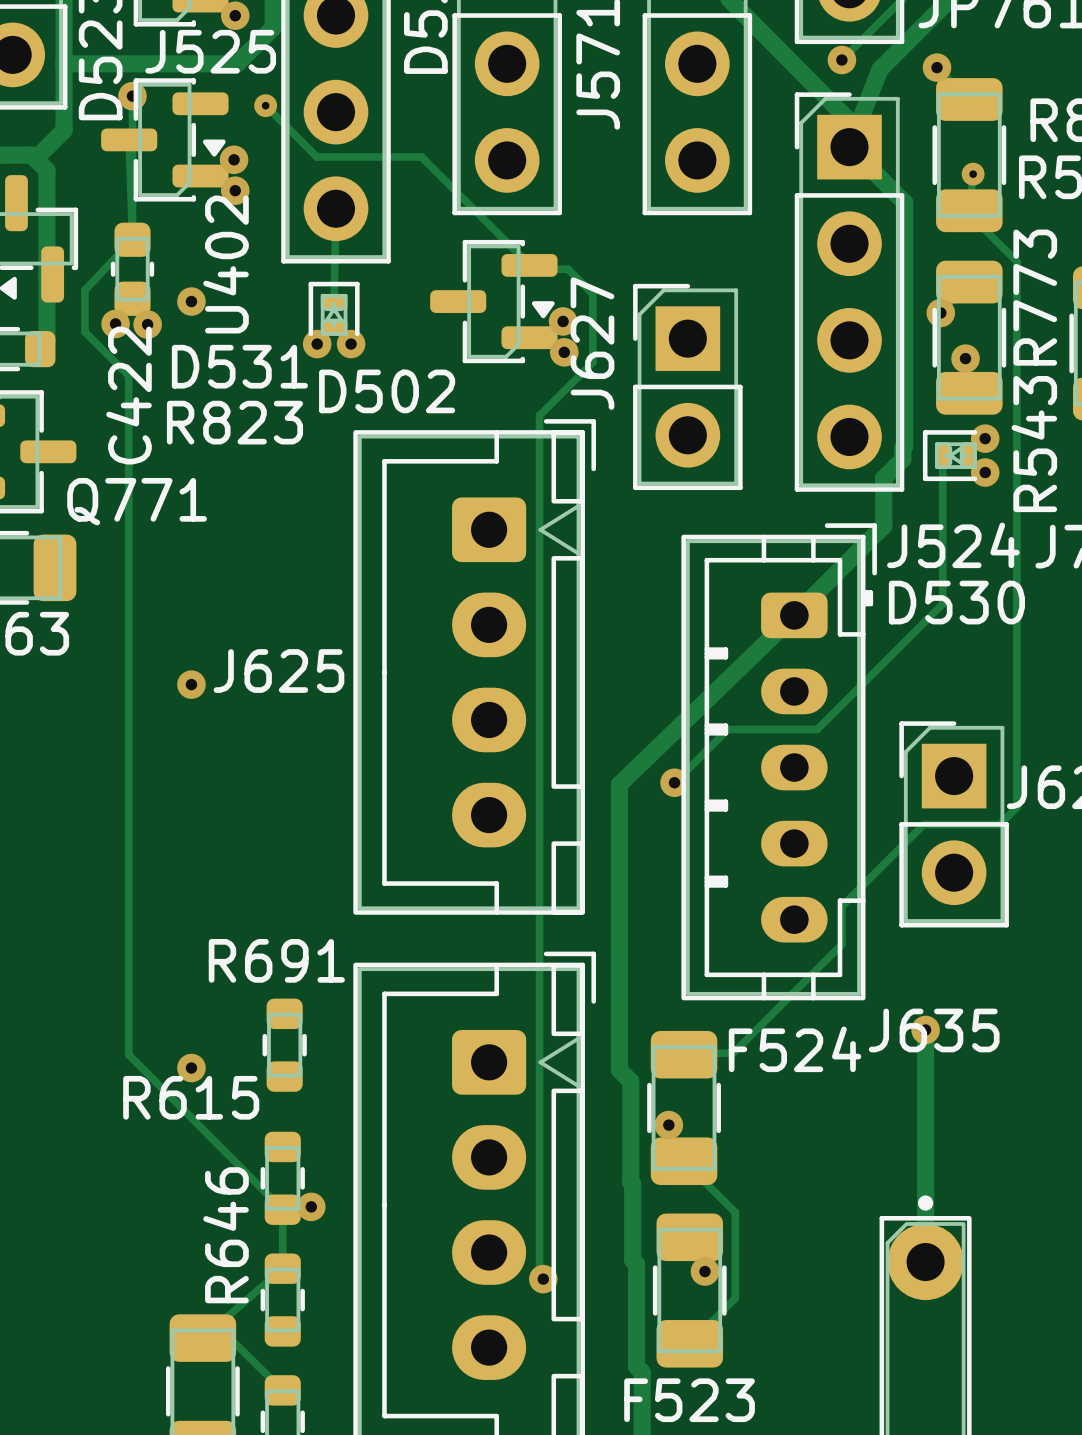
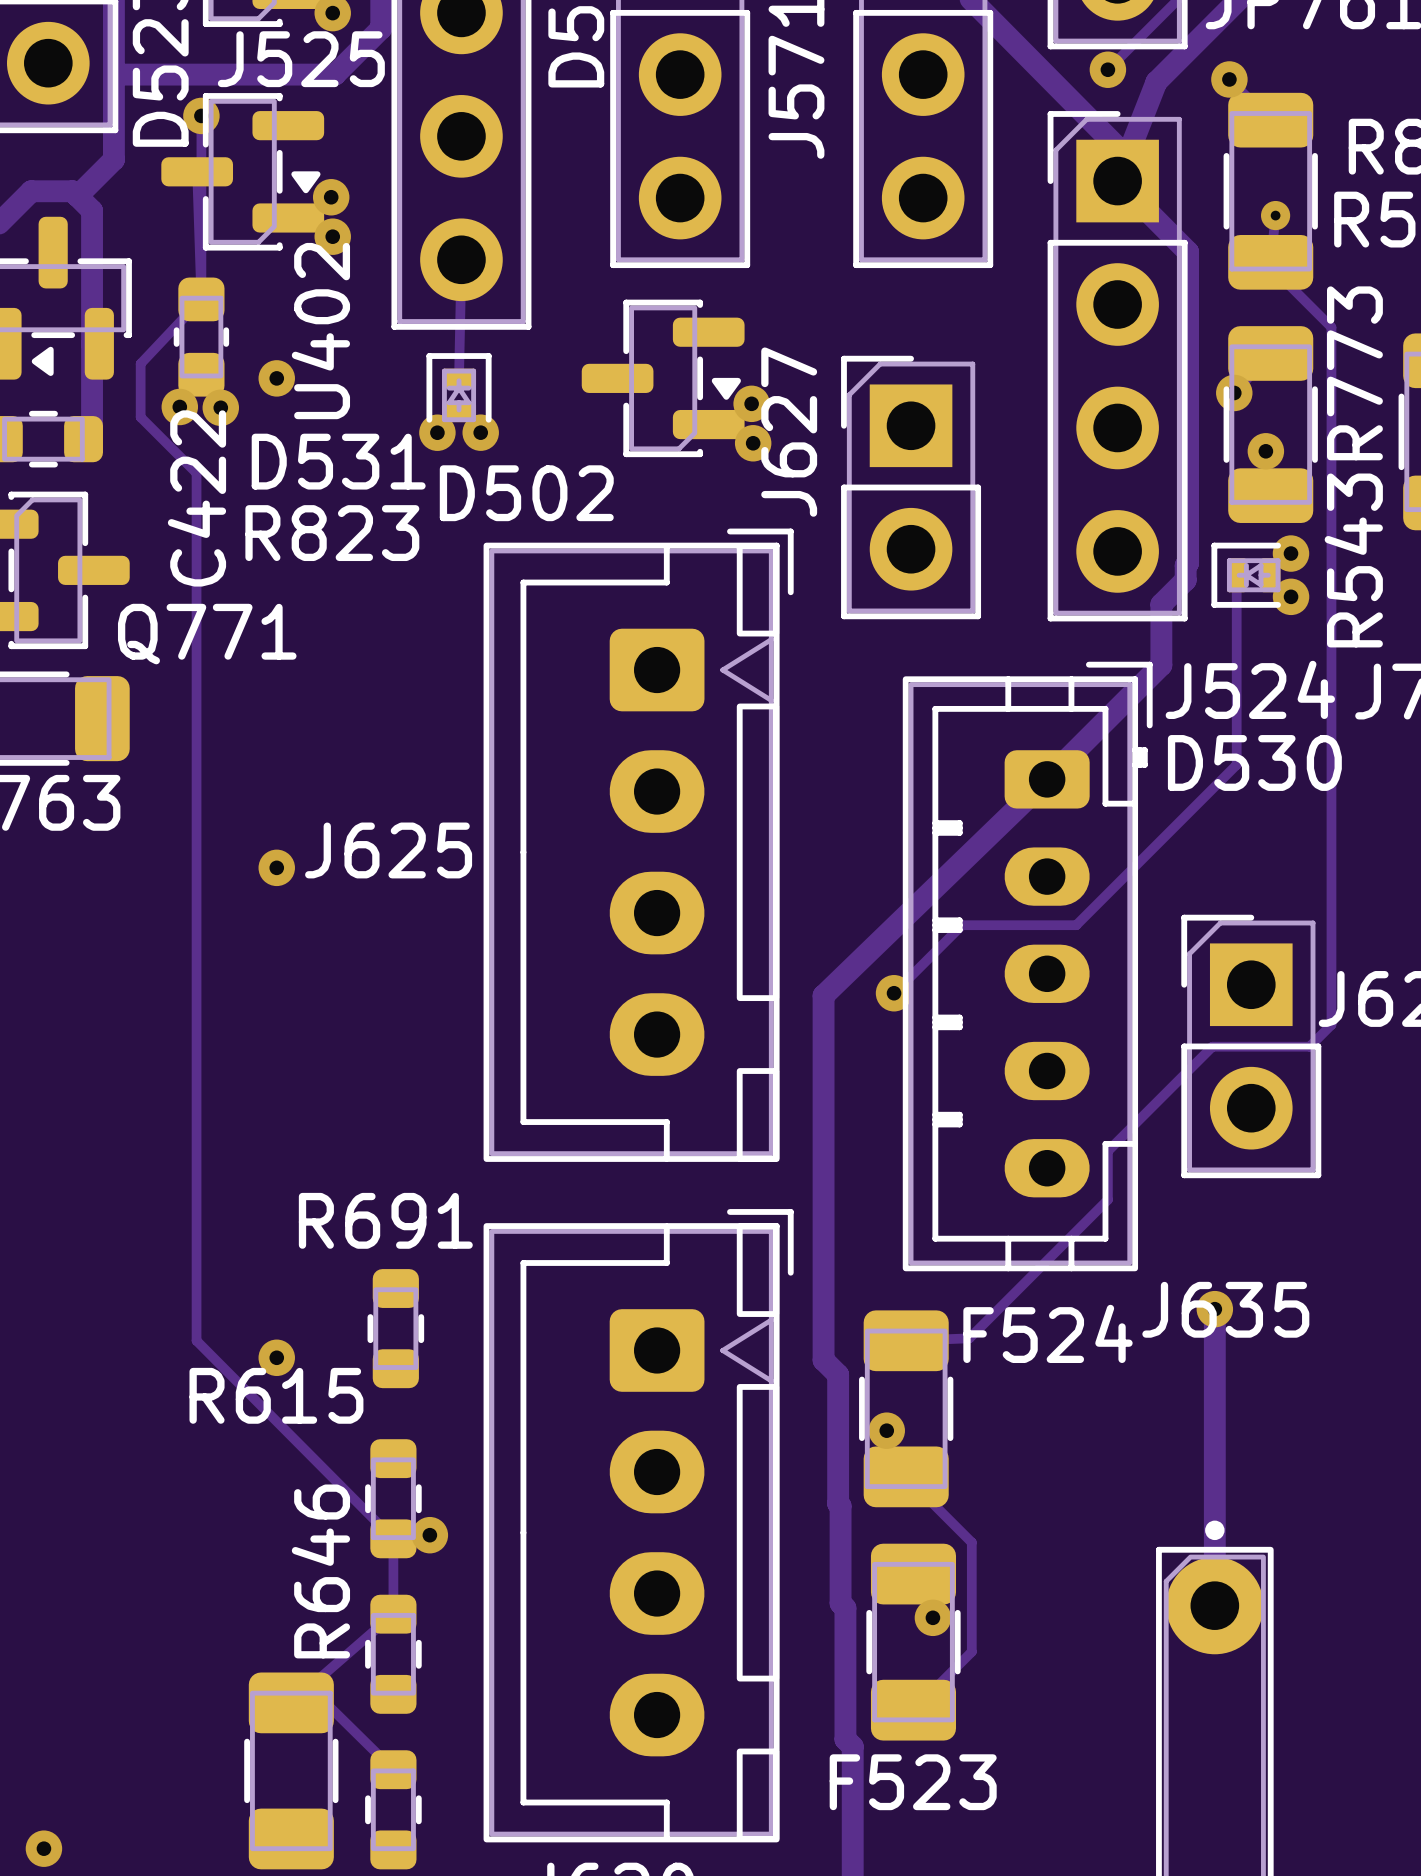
track: (265, 105) (316, 157) (421, 157) (533, 269) (568, 269) (592, 293) (592, 362) (539, 415) (539, 1275) (543, 1279) -> none
via: (265, 105) -> none
via: (543, 1279) -> none

